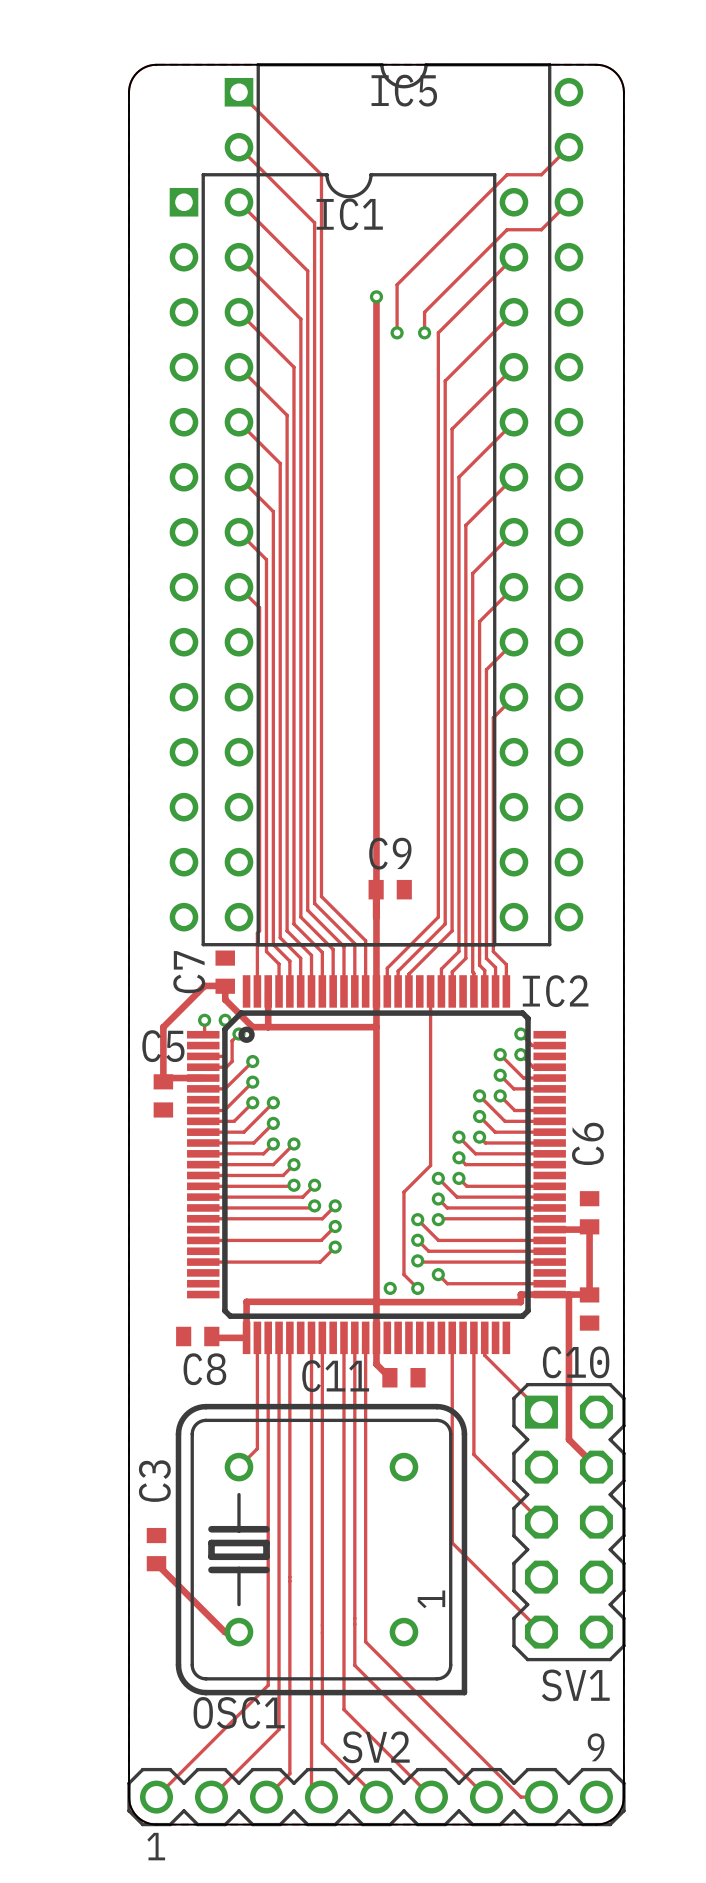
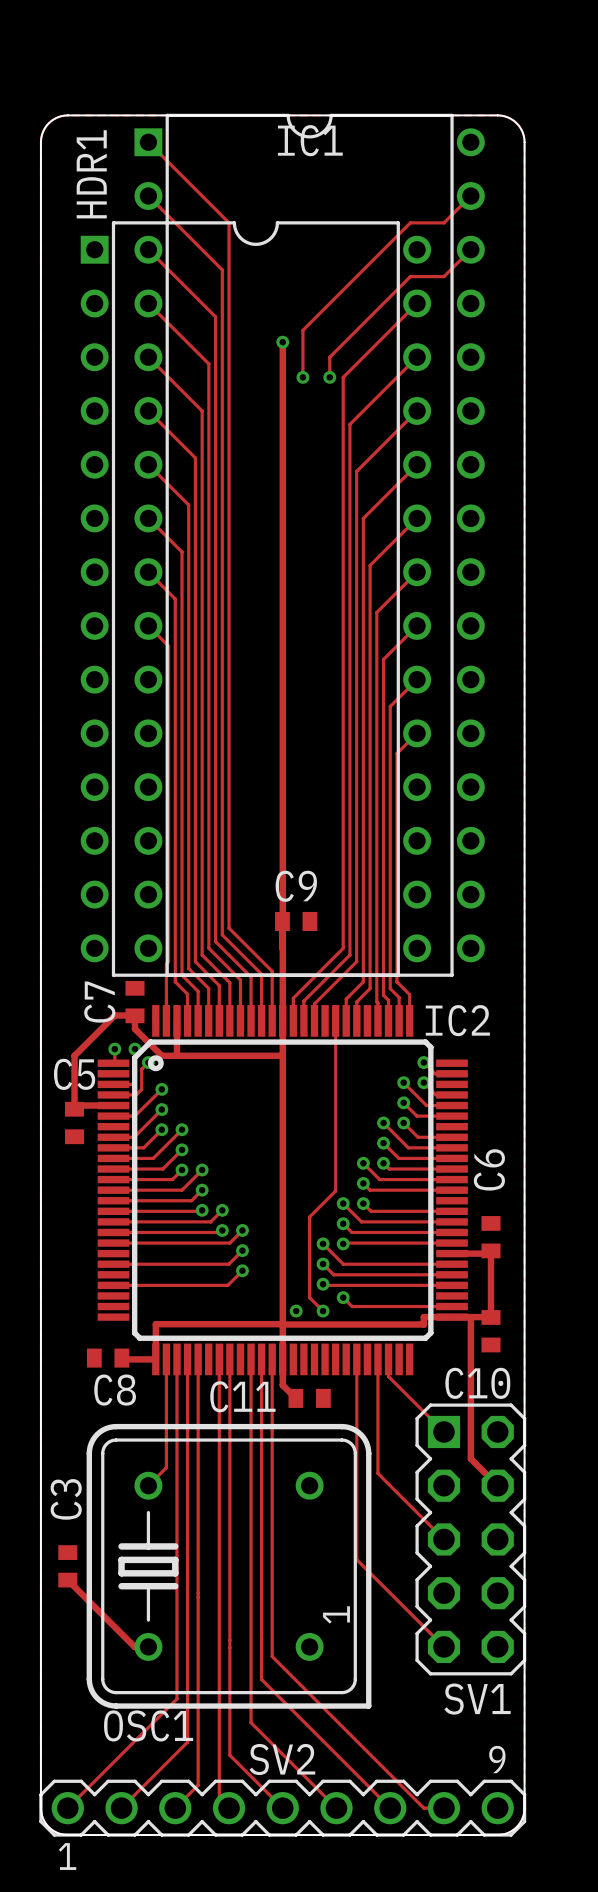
IC5 name: IC5 (404, 90) -> IC1 (310, 140)
IC1 name: IC1 (349, 214) -> HDR1 (91, 174)

